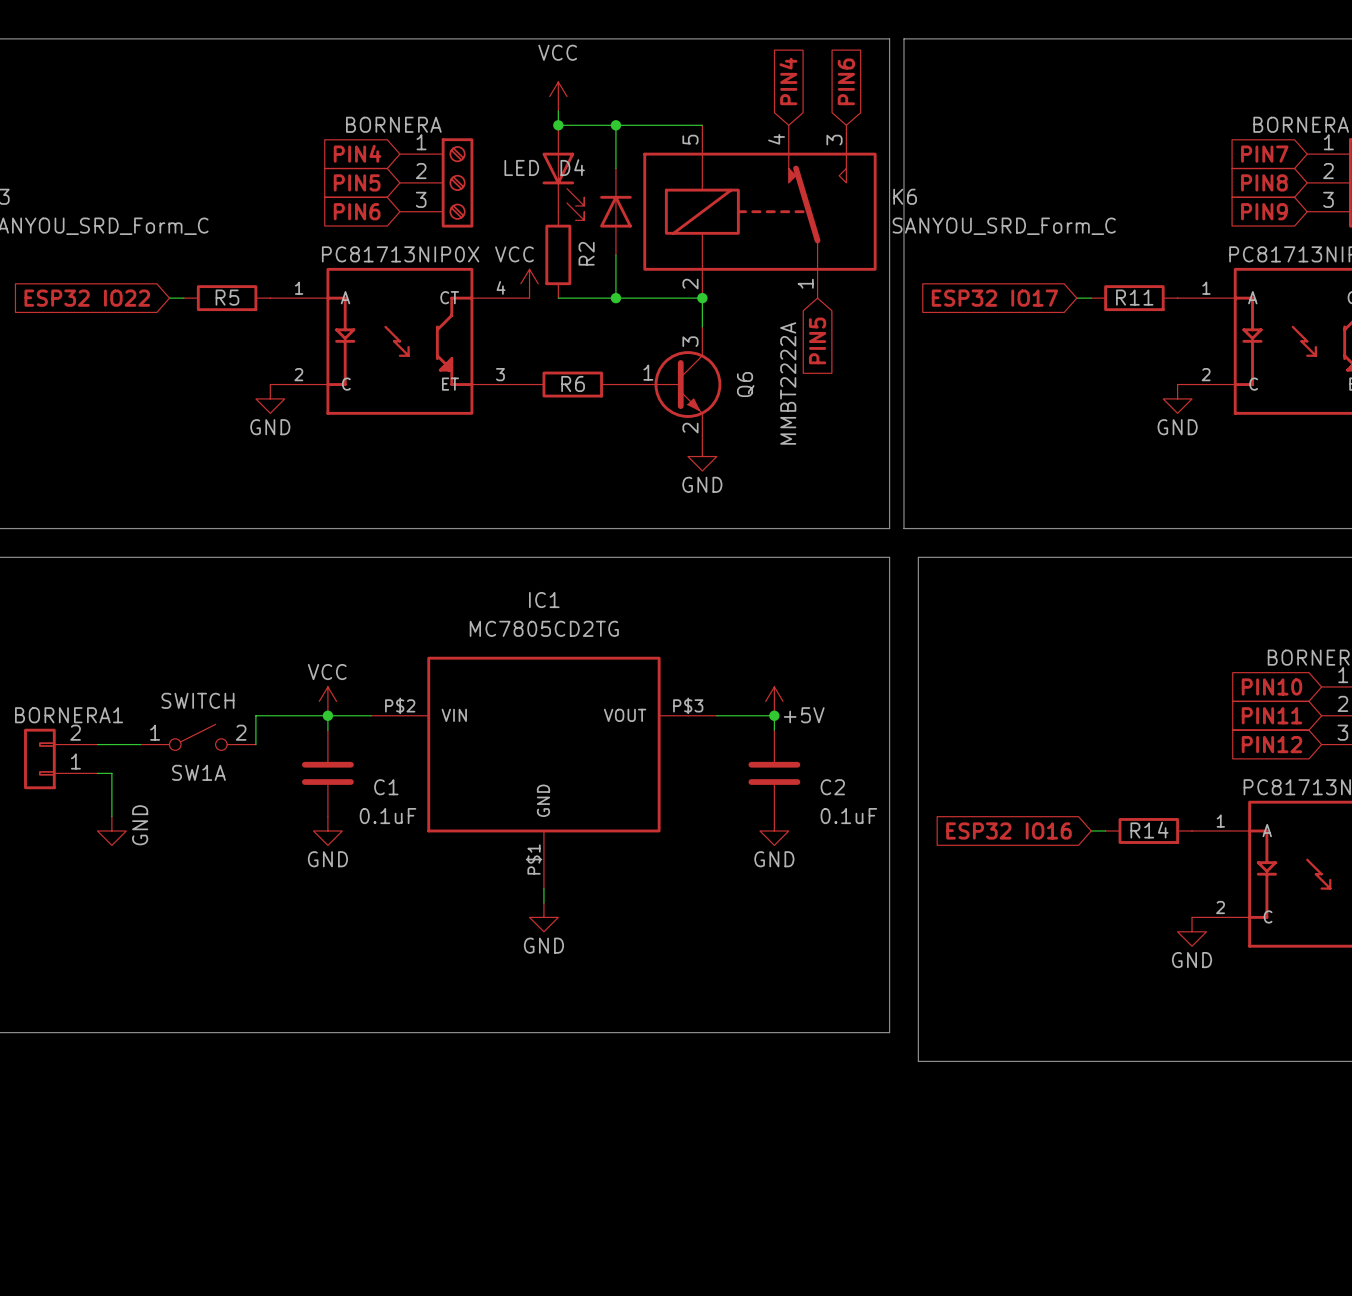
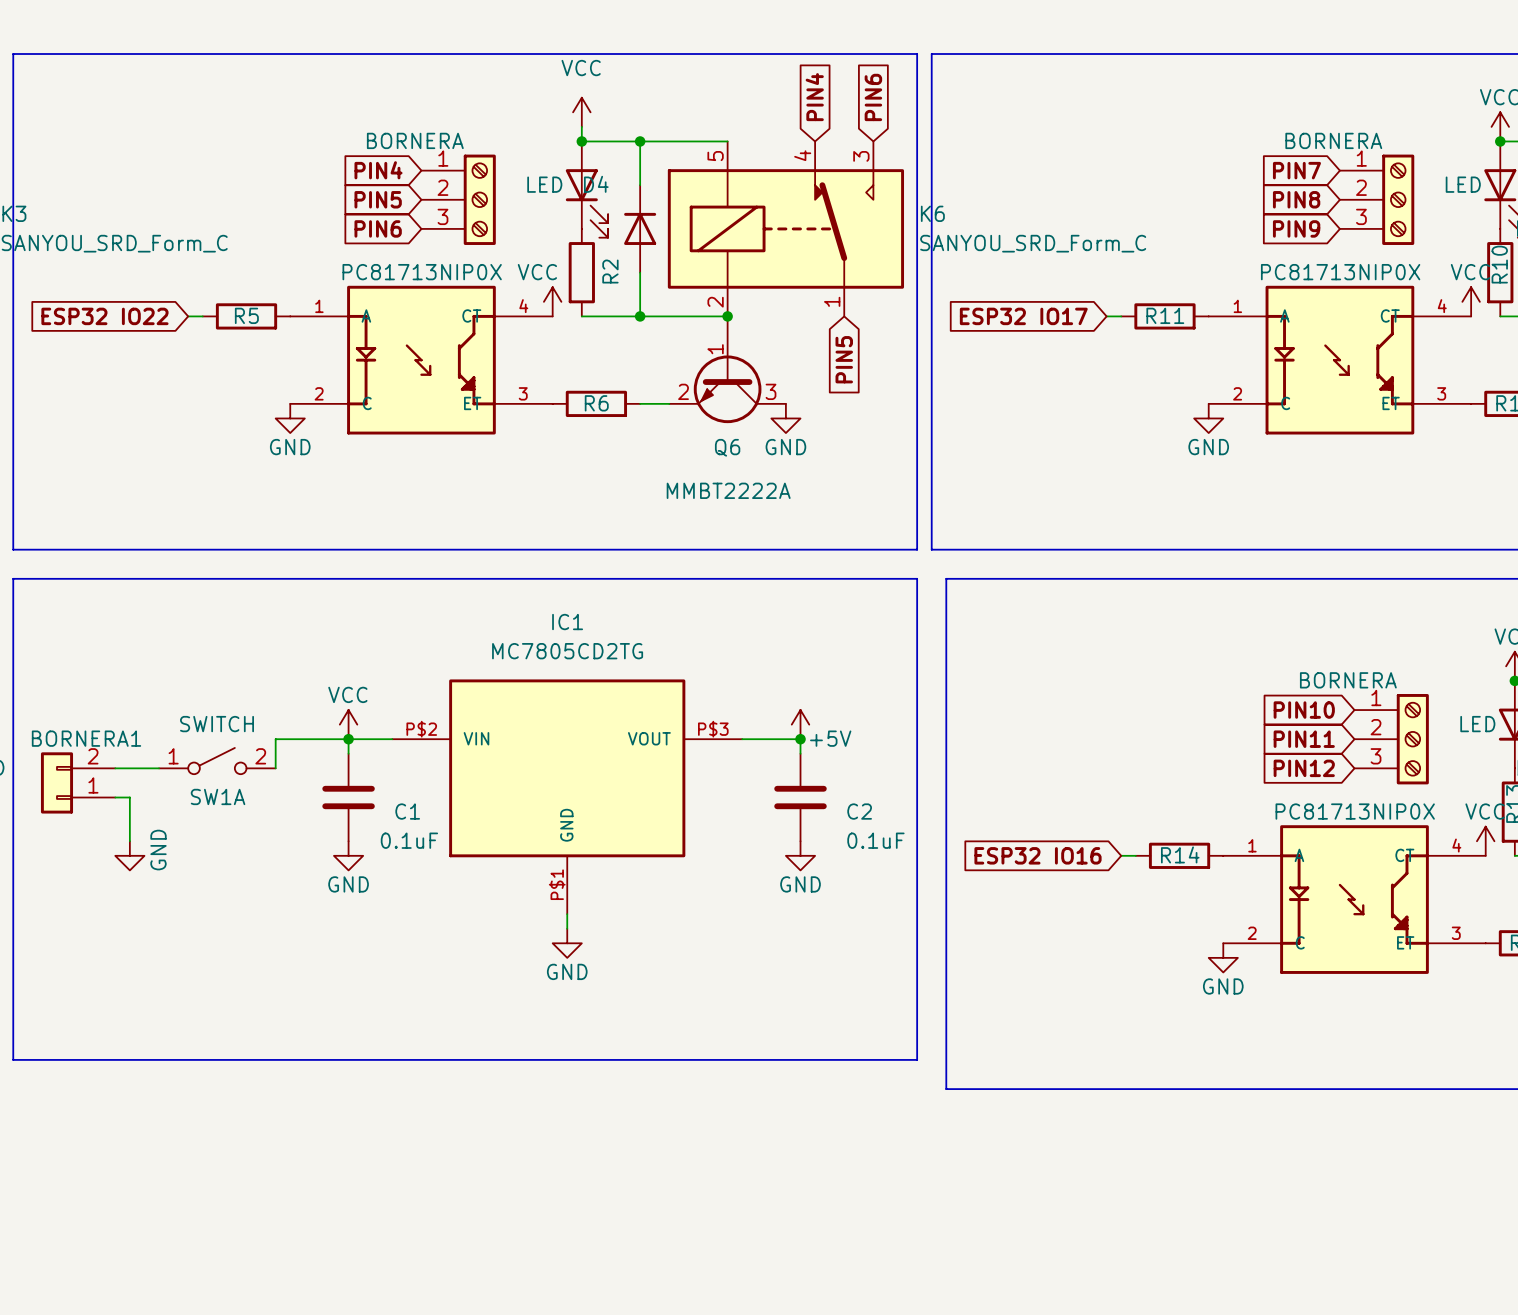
Q6 rotation: 0° (687, 384) -> 90° clockwise (727, 389)
power symbol position: GND (702, 456) -> GND (785, 418)

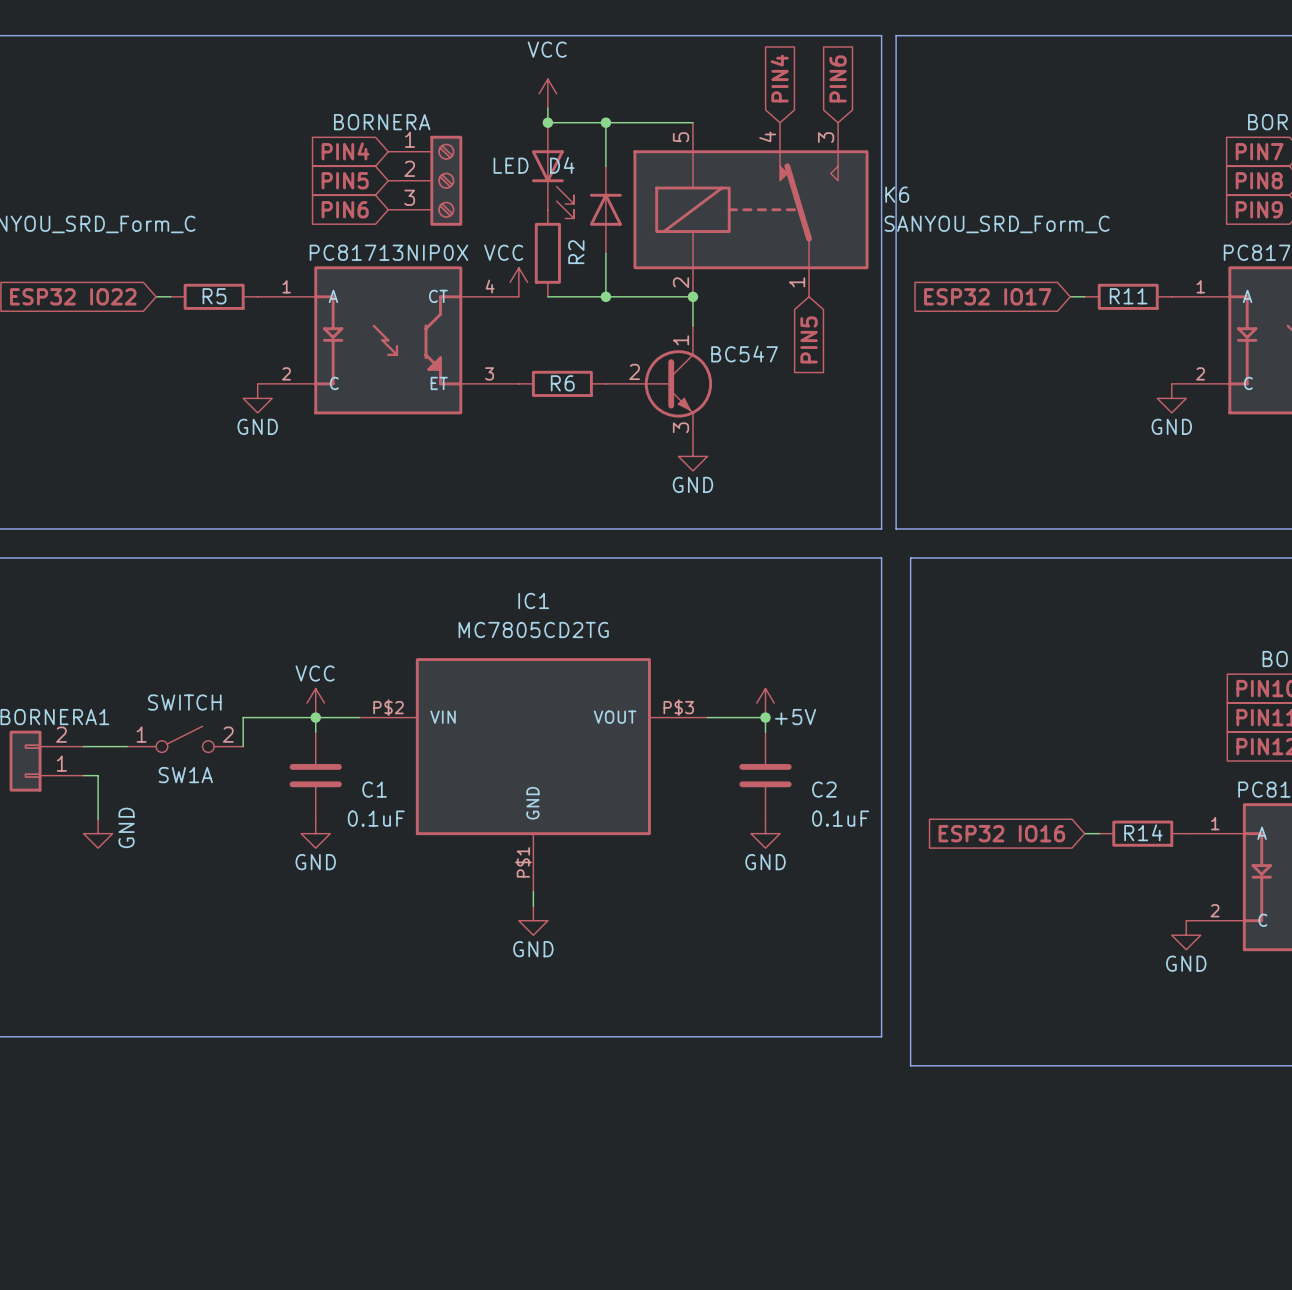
Q6: MMBT2222A (727, 369) -> none
part: none -> BC547 (659, 383)
power symbol position: GND (785, 418) -> GND (692, 456)

